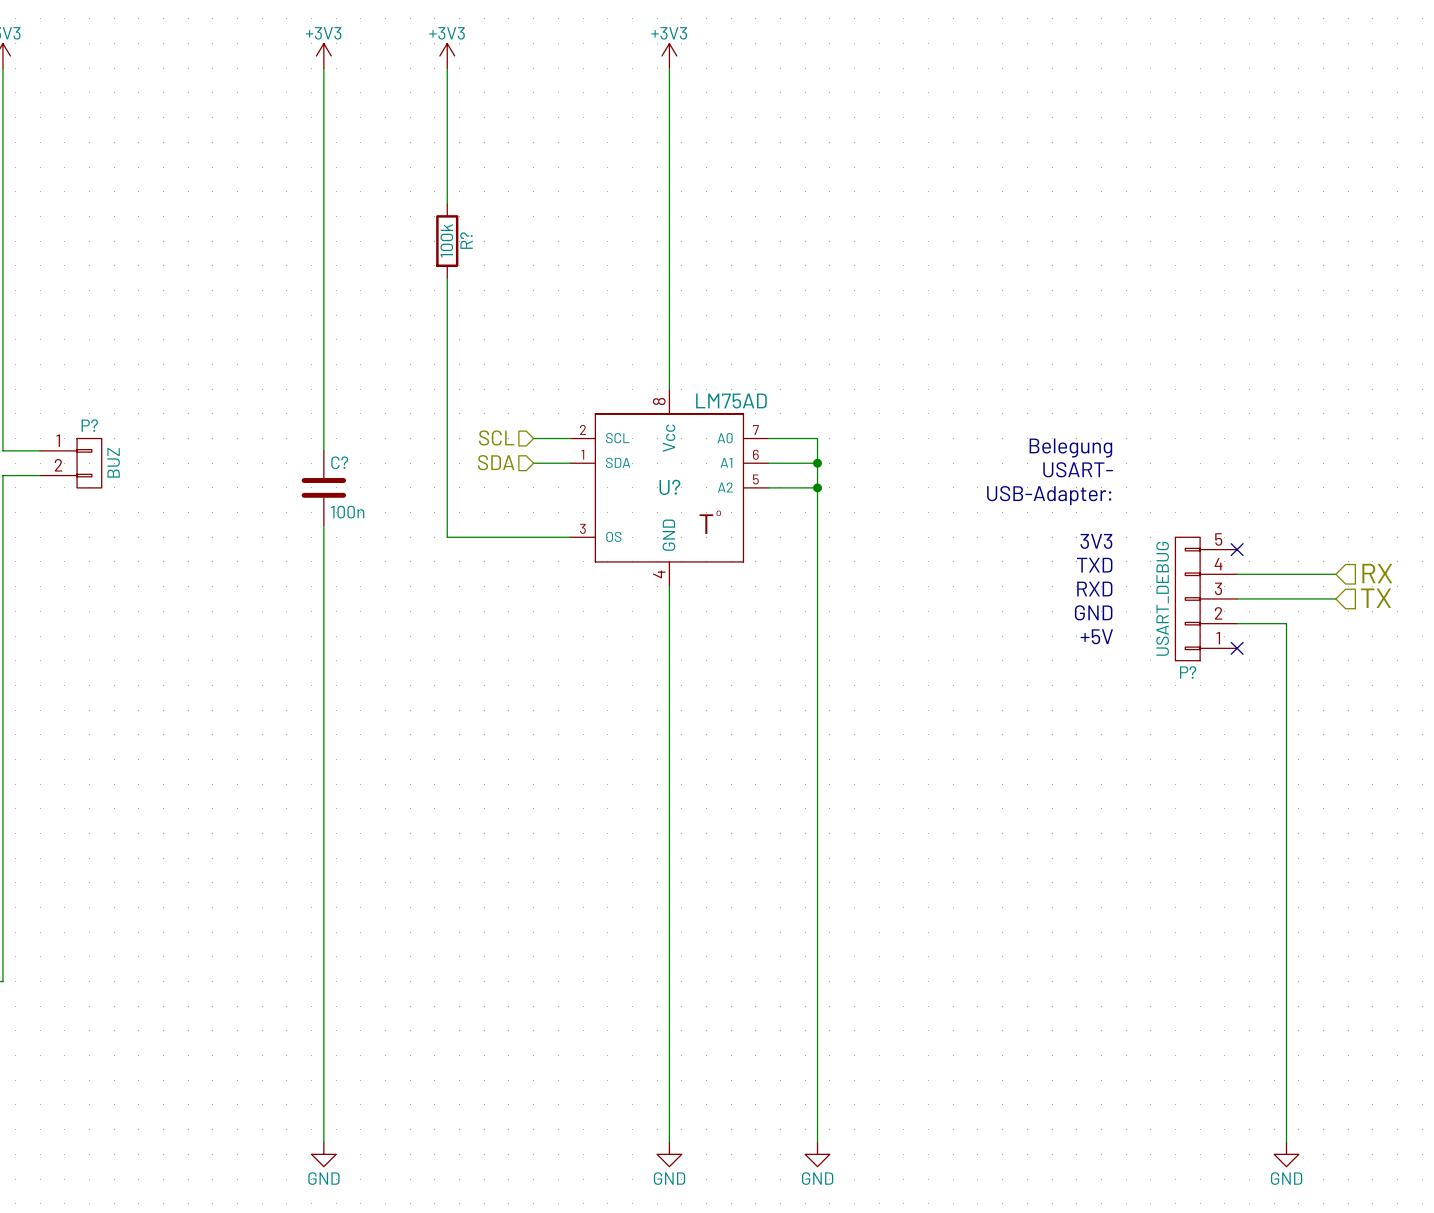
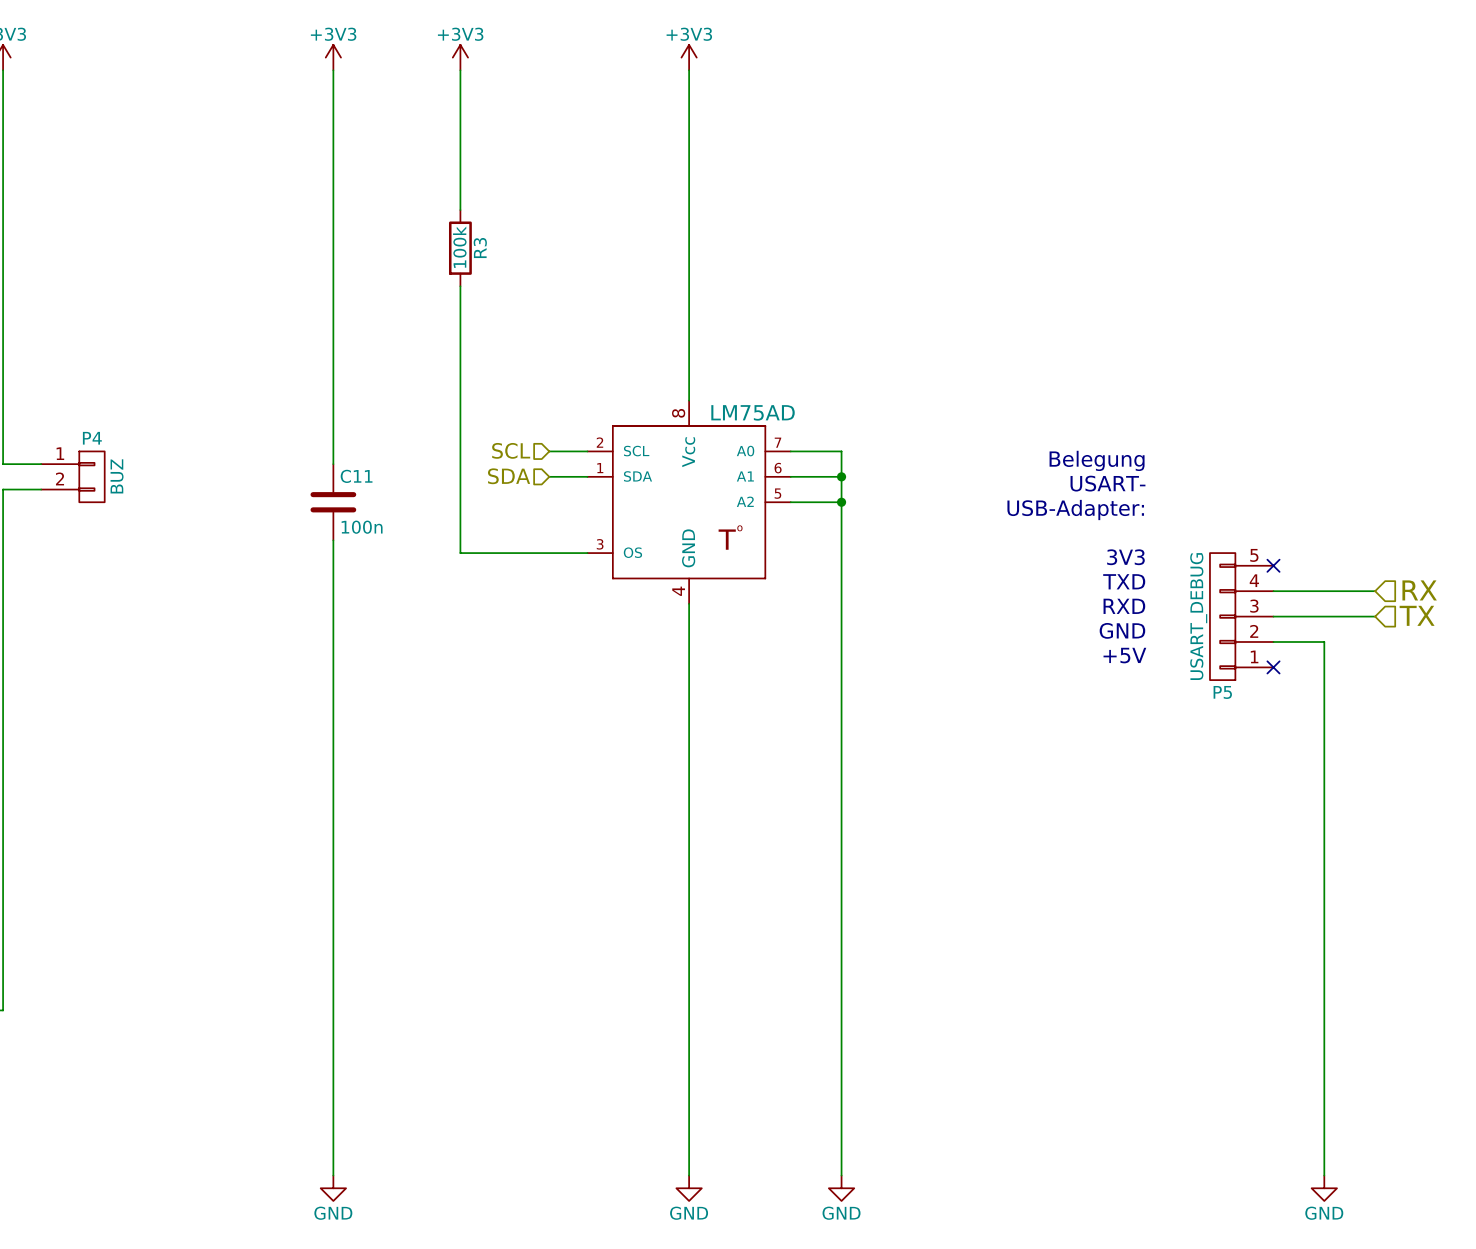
R? name: R? (466, 240) -> R3 (480, 248)
P? name: P? (89, 425) -> P4 (92, 438)
C? name: C? (339, 462) -> C11 (356, 476)
U?: LM75AD (669, 487) -> none
P? name: P? (1188, 672) -> P5 (1222, 692)

